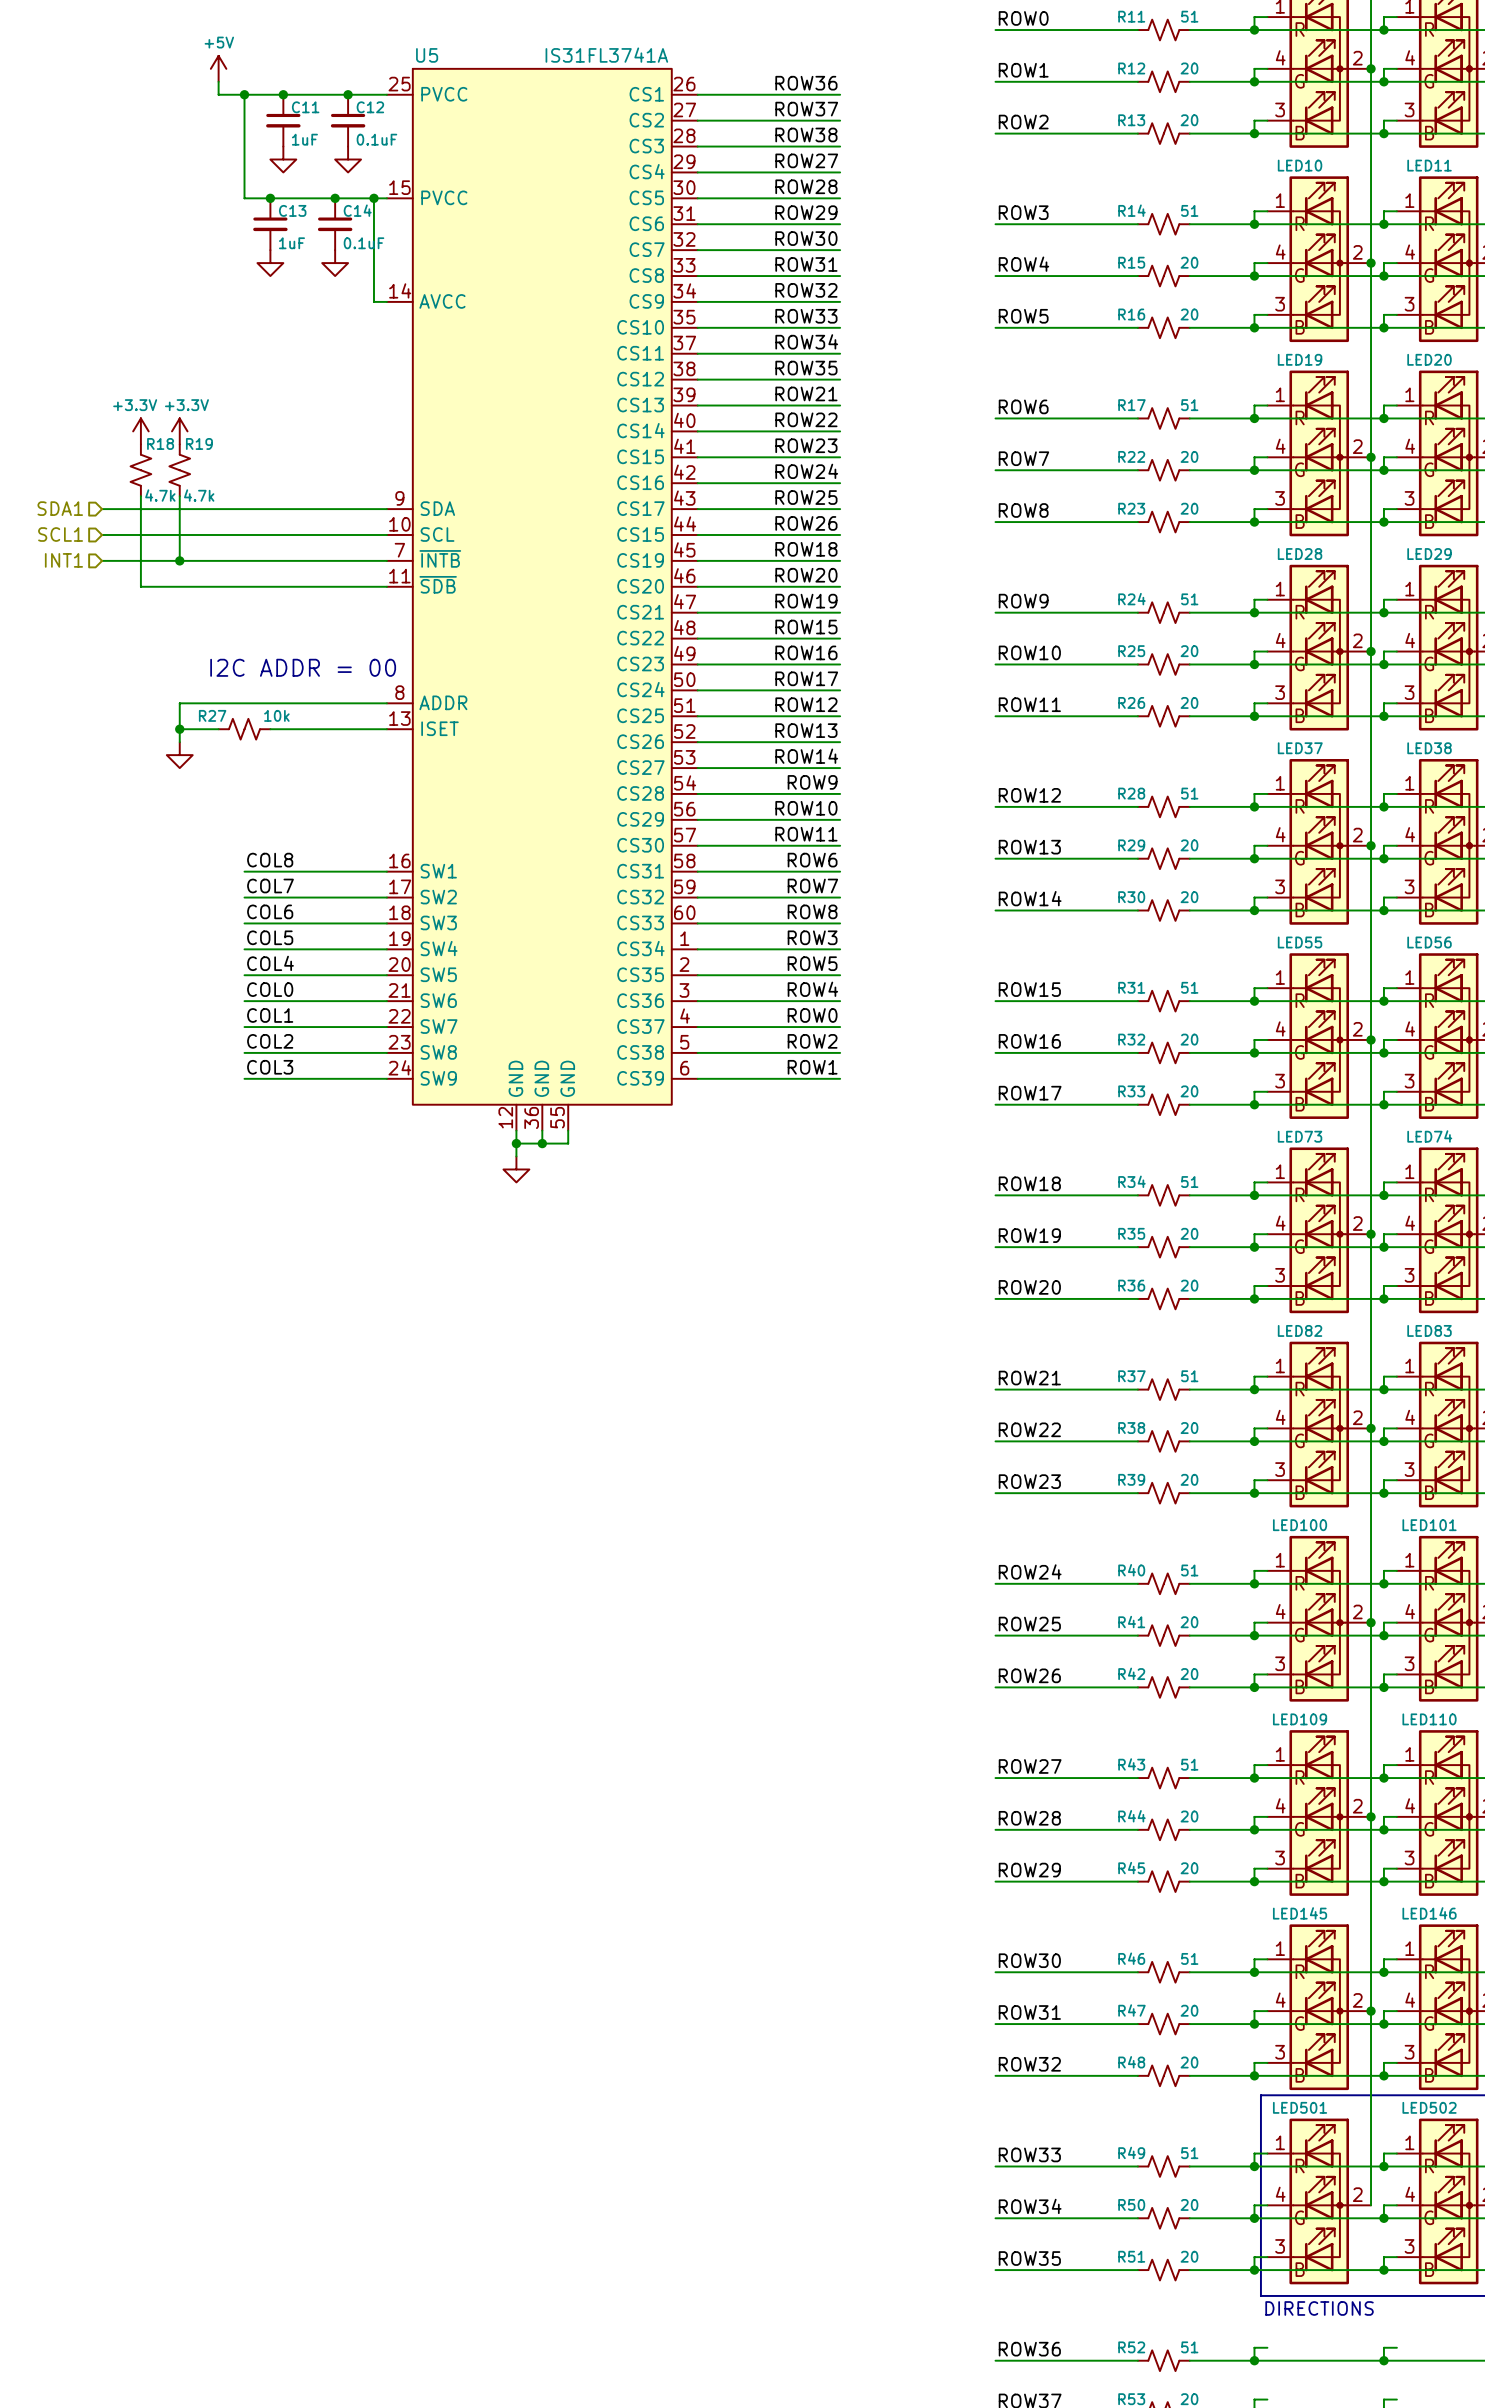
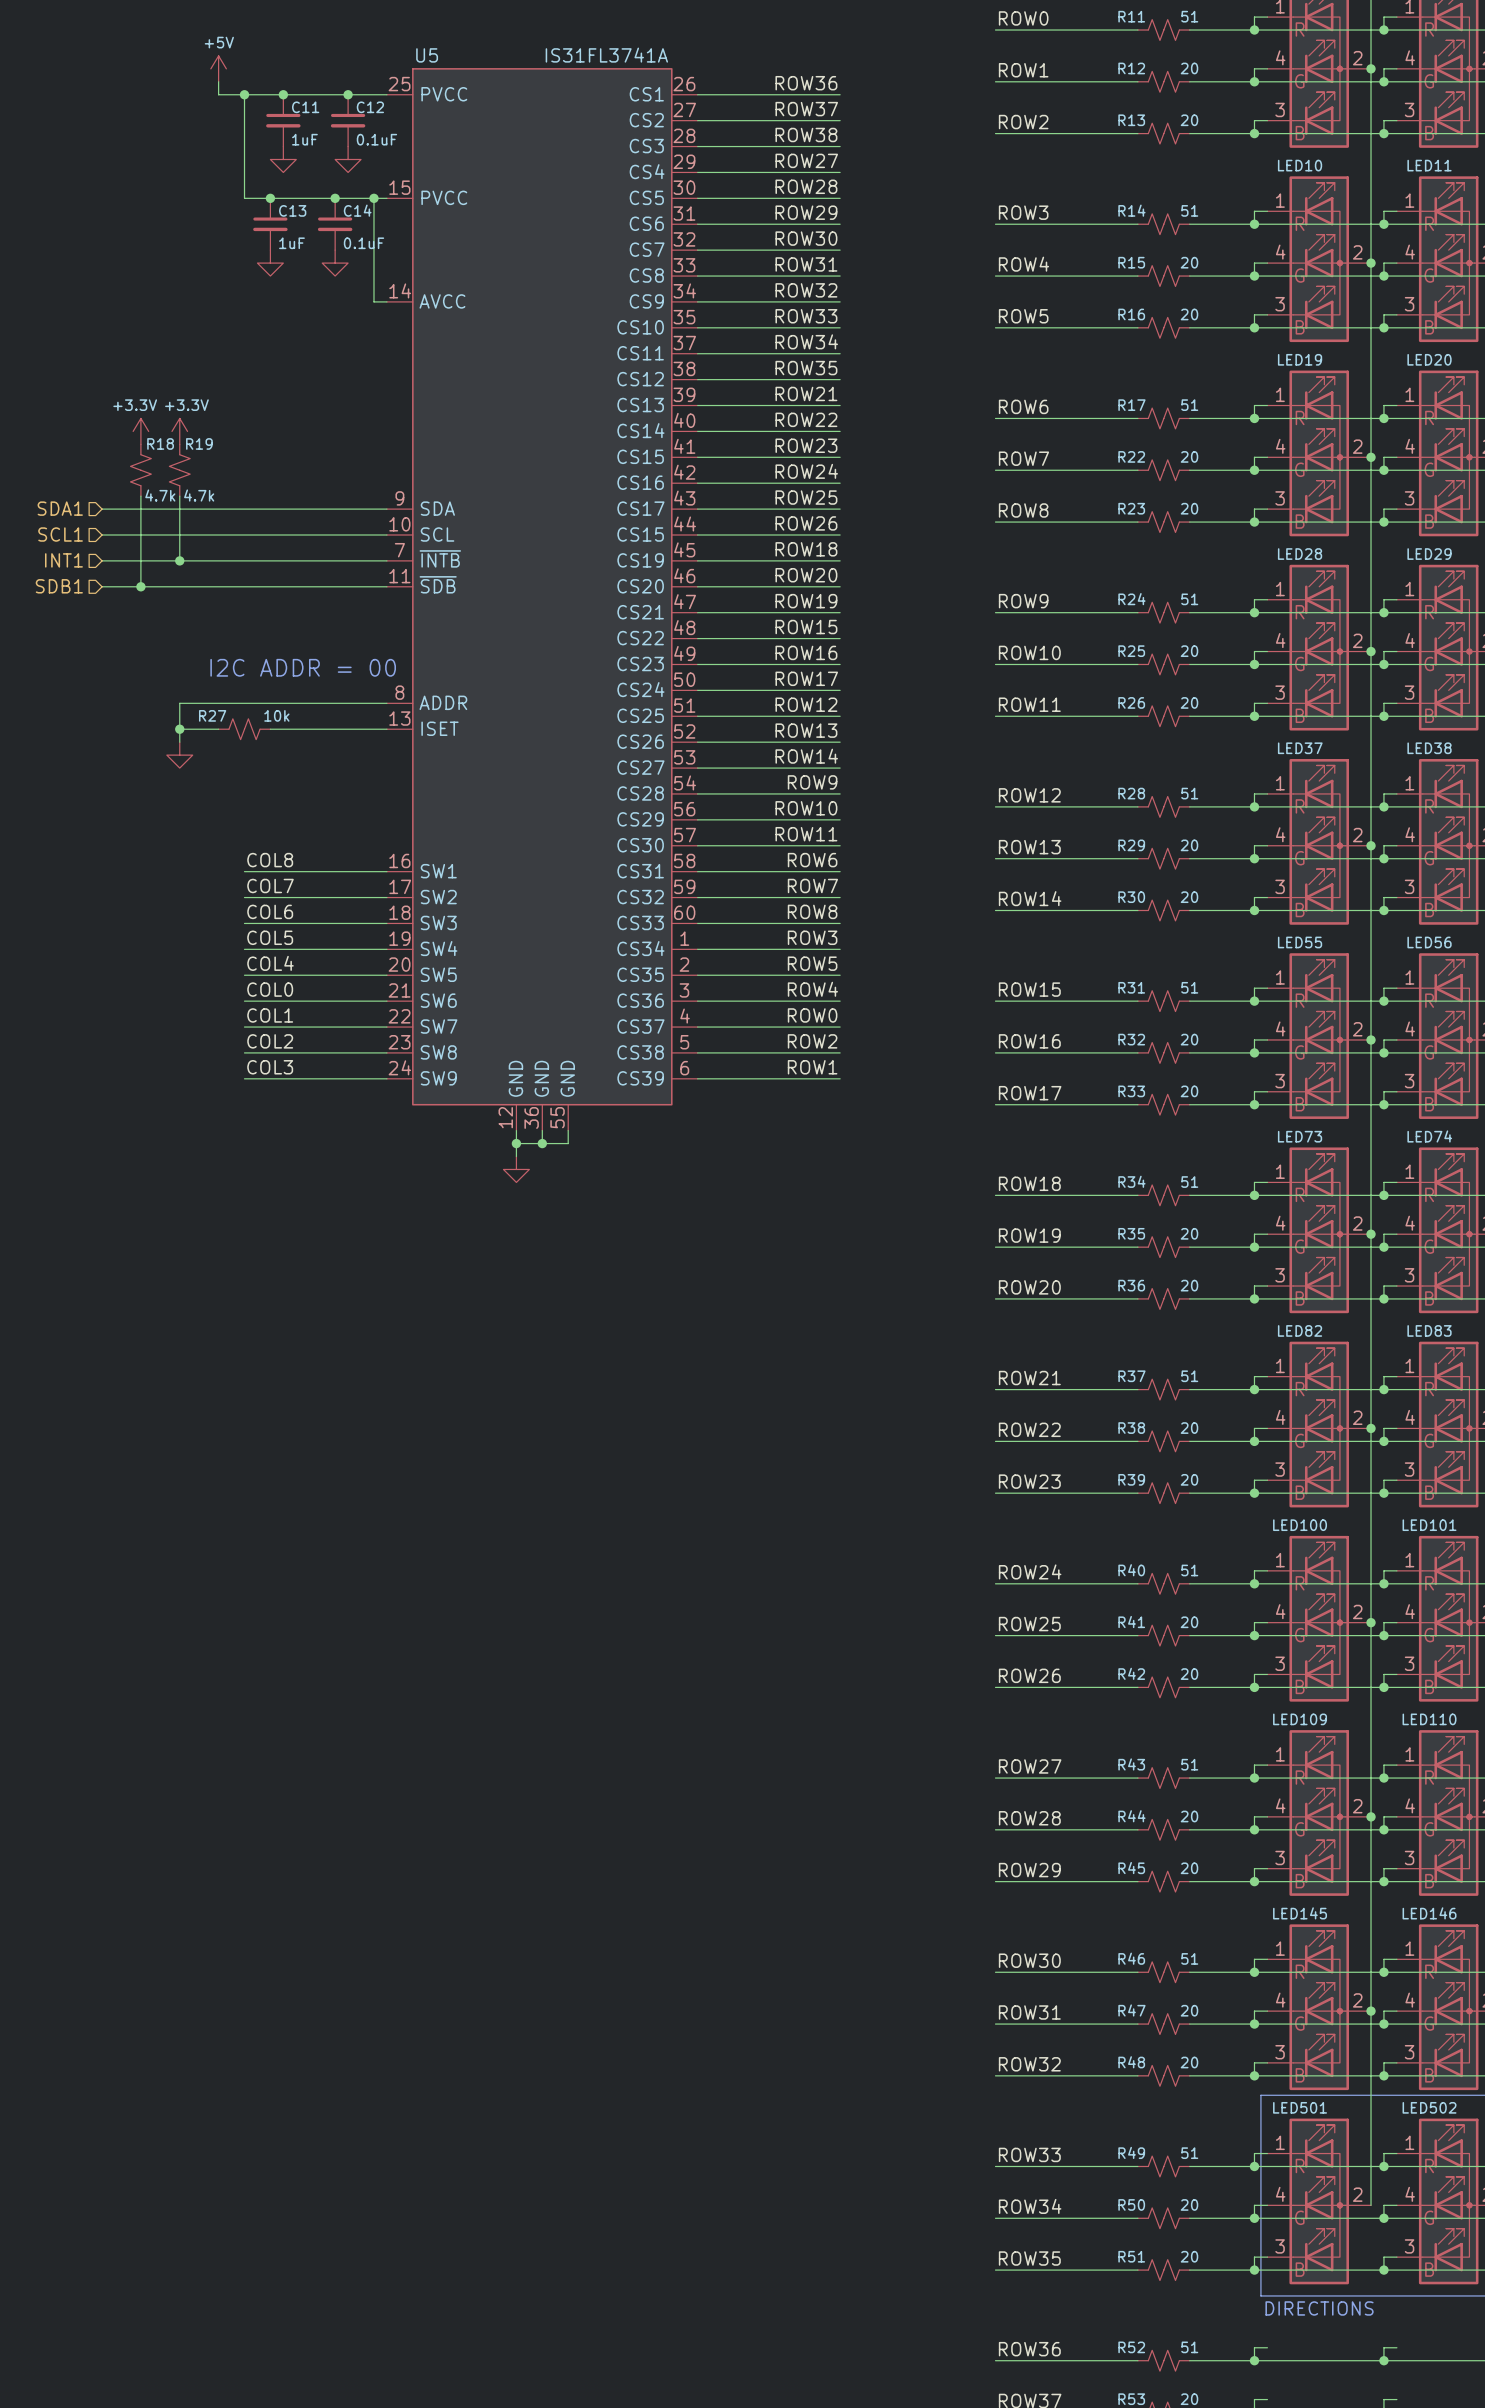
hierarchical label: none -> SDB1 (59, 586)
wire: none -> (102, 586) (140, 586)
junction: none -> (140, 586)

